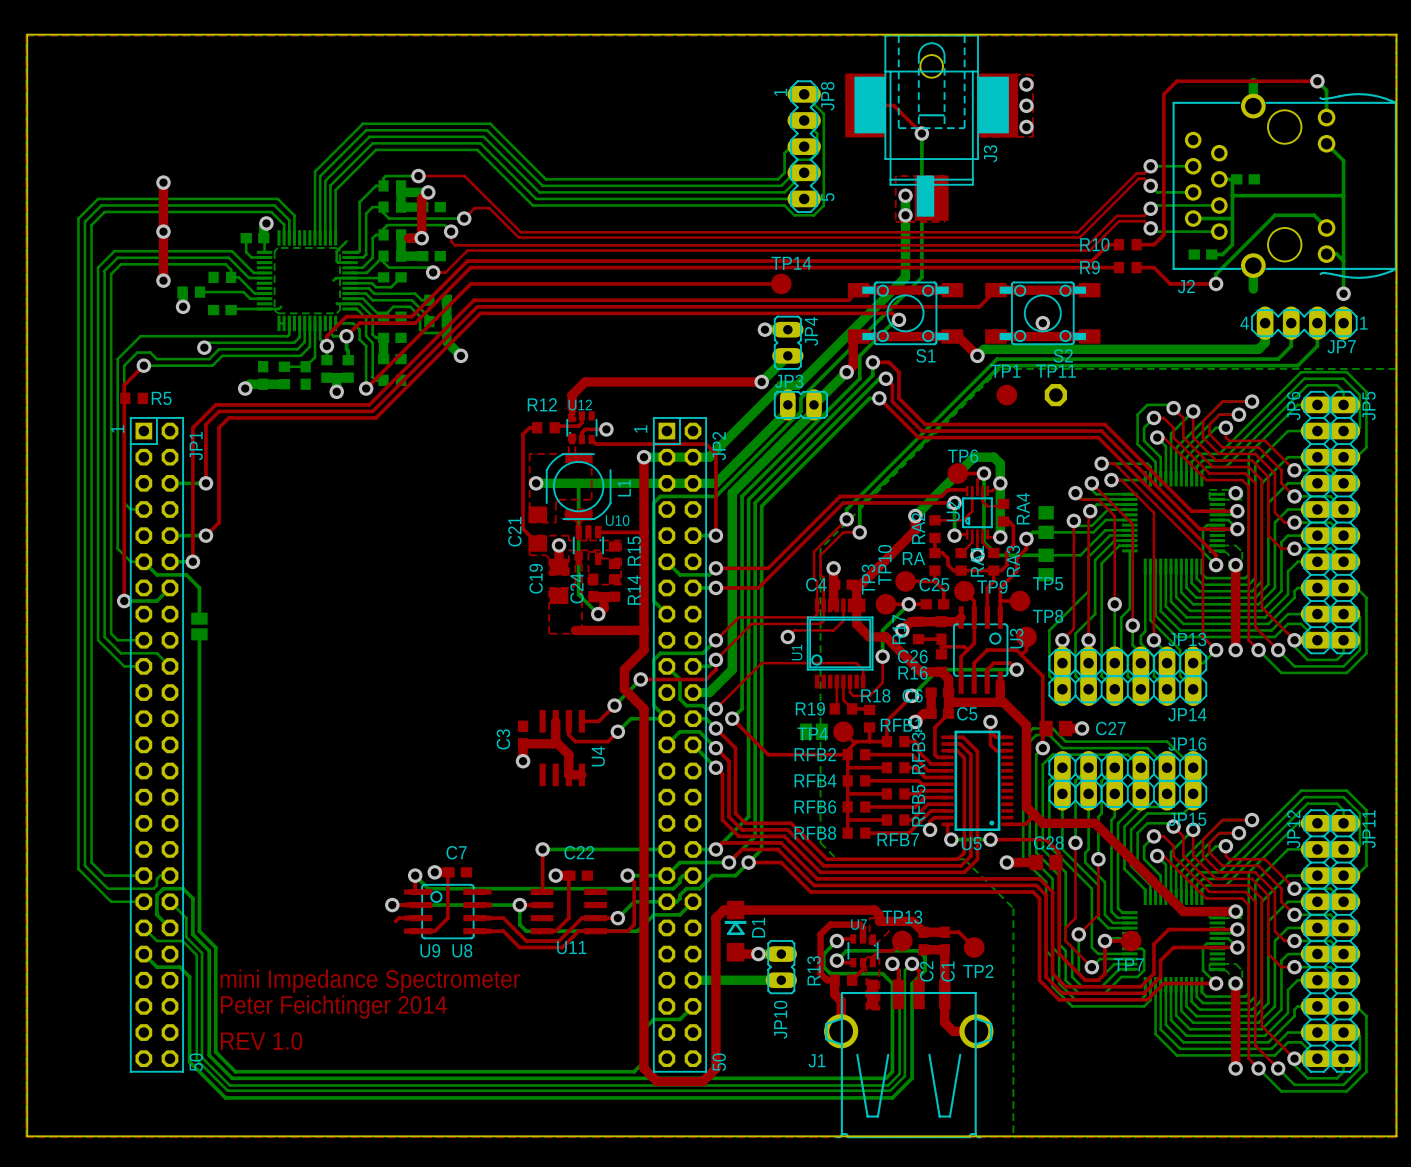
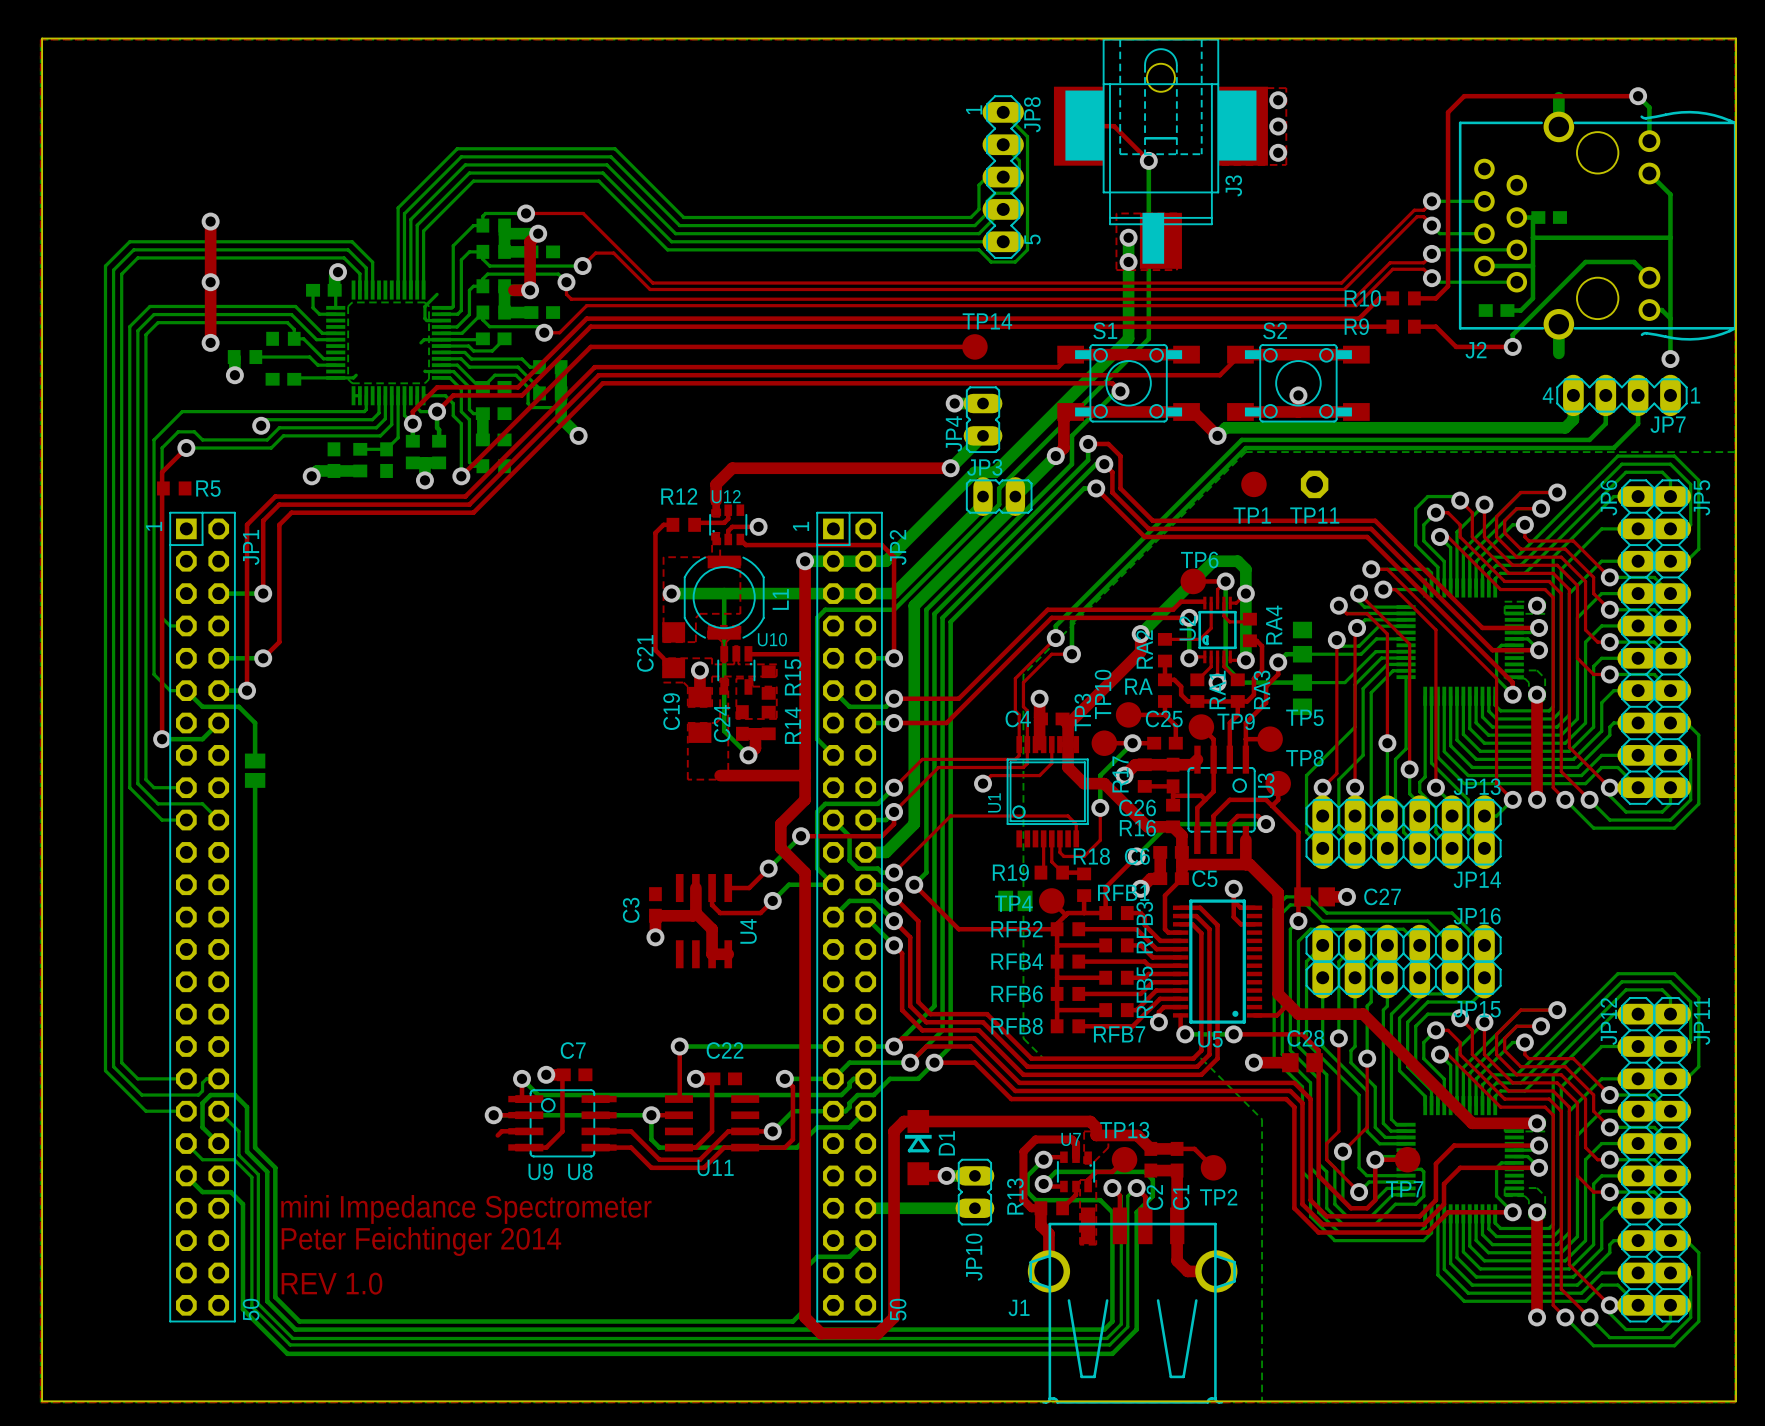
JP4 name position: JP4 (811, 331) -> JP4 (954, 433)
S1 name position: S1 (925, 355) -> S1 (1105, 330)
S2 name position: S2 (1063, 355) -> S2 (1275, 330)
TP1 name position: TP1 (1005, 371) -> TP1 (1252, 515)
TP11 name position: TP11 (1056, 371) -> TP11 (1314, 515)
L1 footprint: [546, 452, 612, 521] -> [683, 555, 765, 640]

